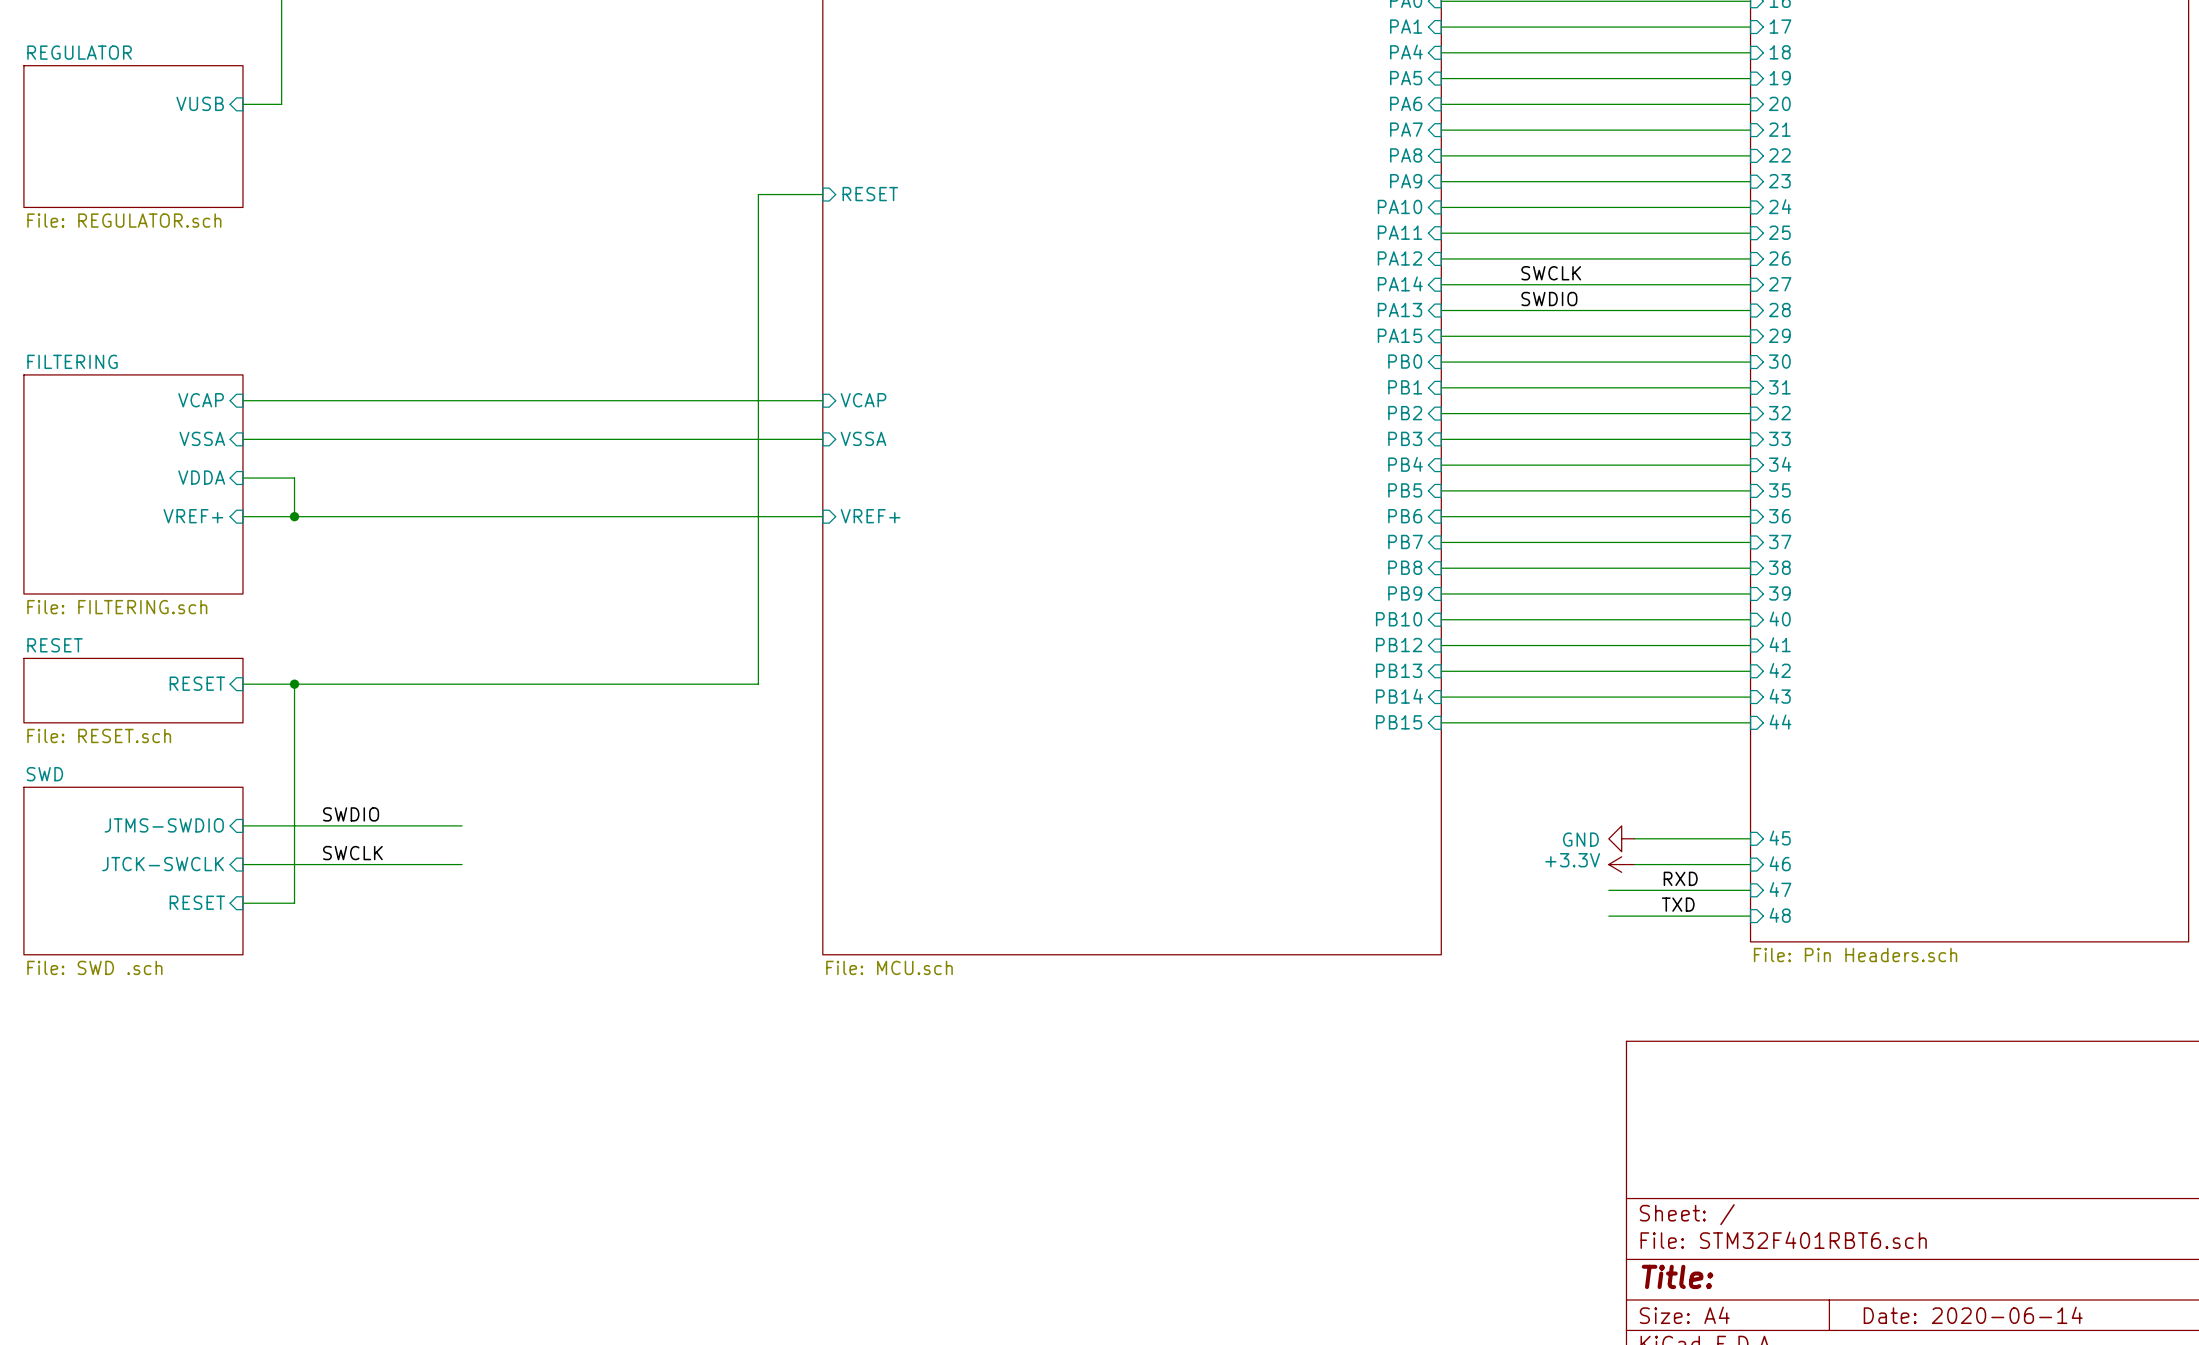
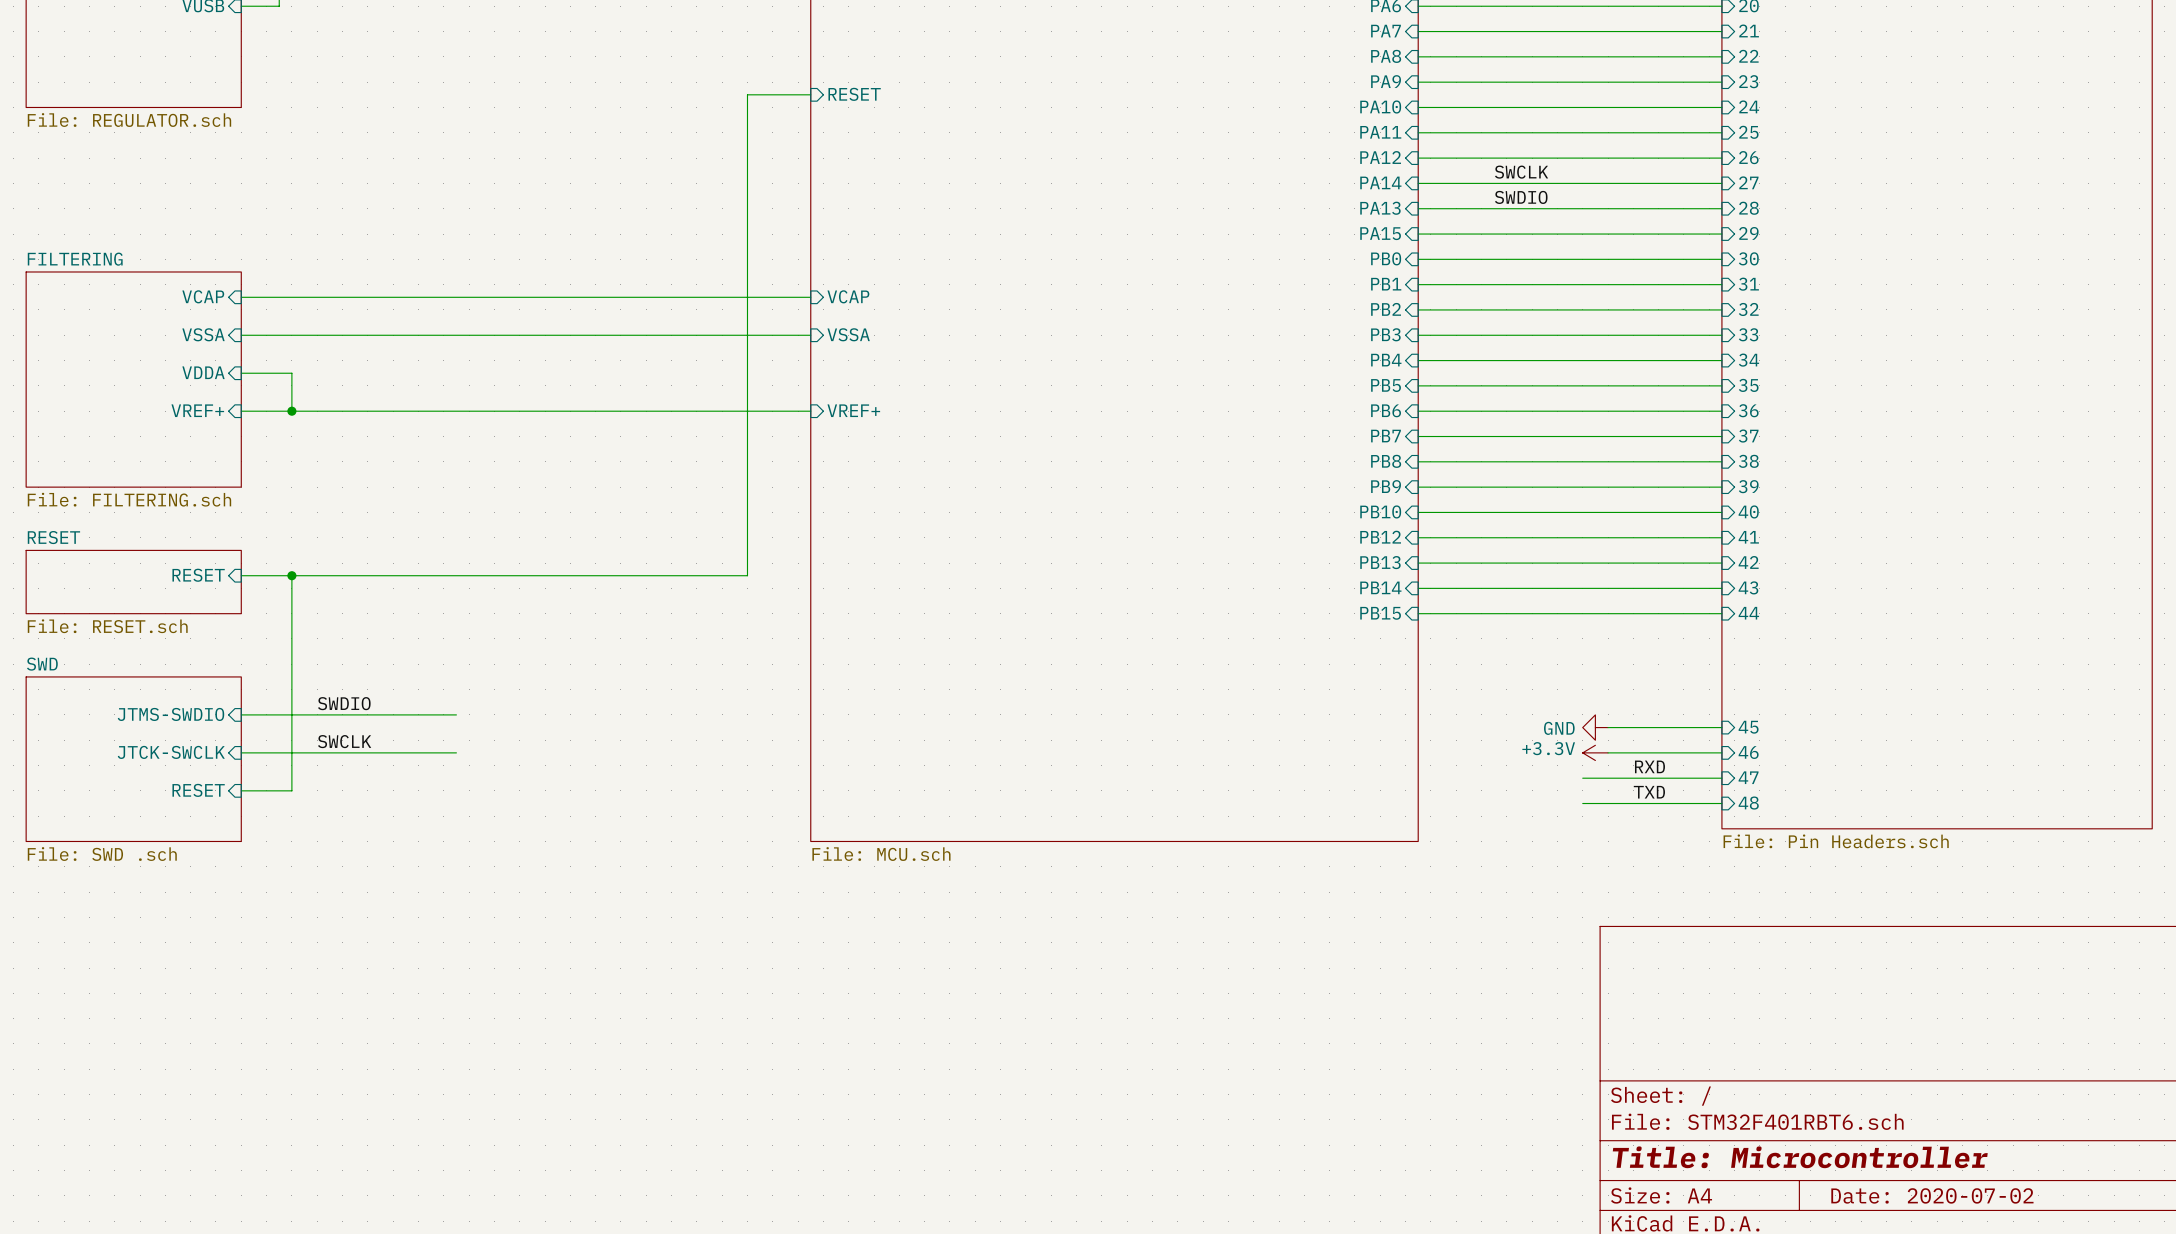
title block: Title: (1677, 1276) -> Title: Microcontroller (1800, 1157)
title block: Date: 2020-06-14 (1973, 1315) -> Date: 2020-07-02 (1932, 1195)

